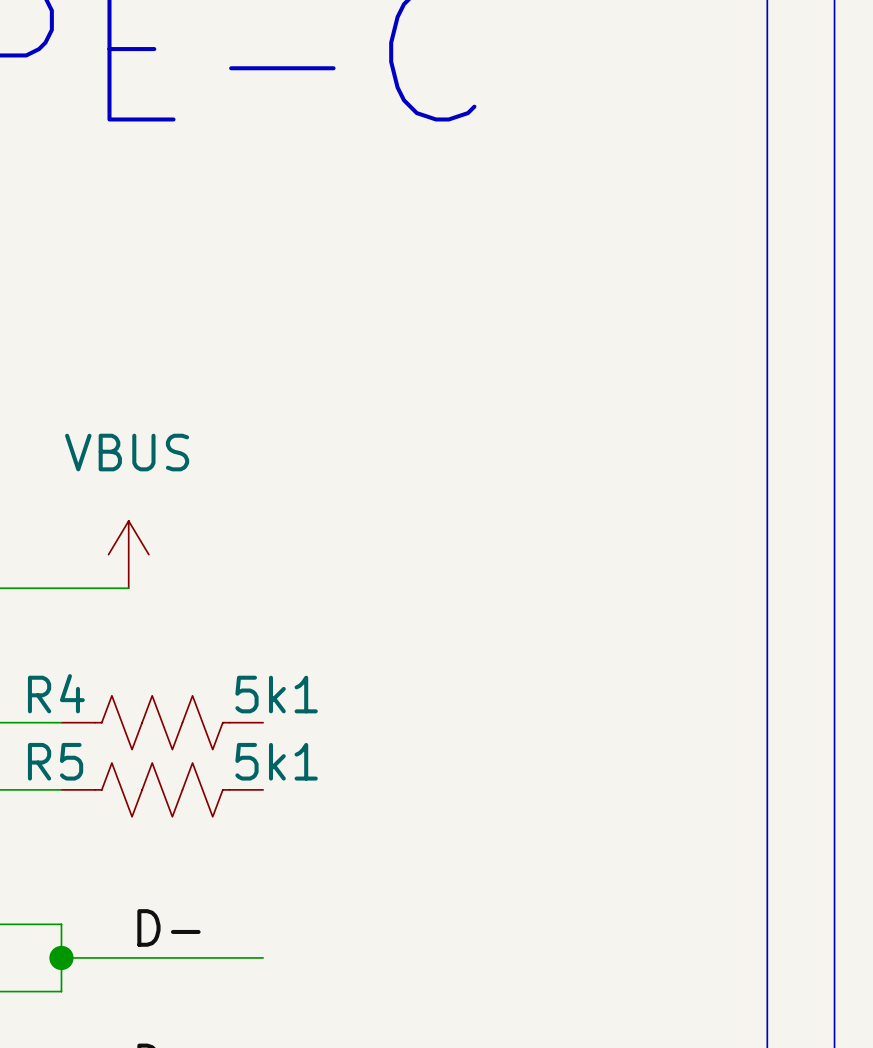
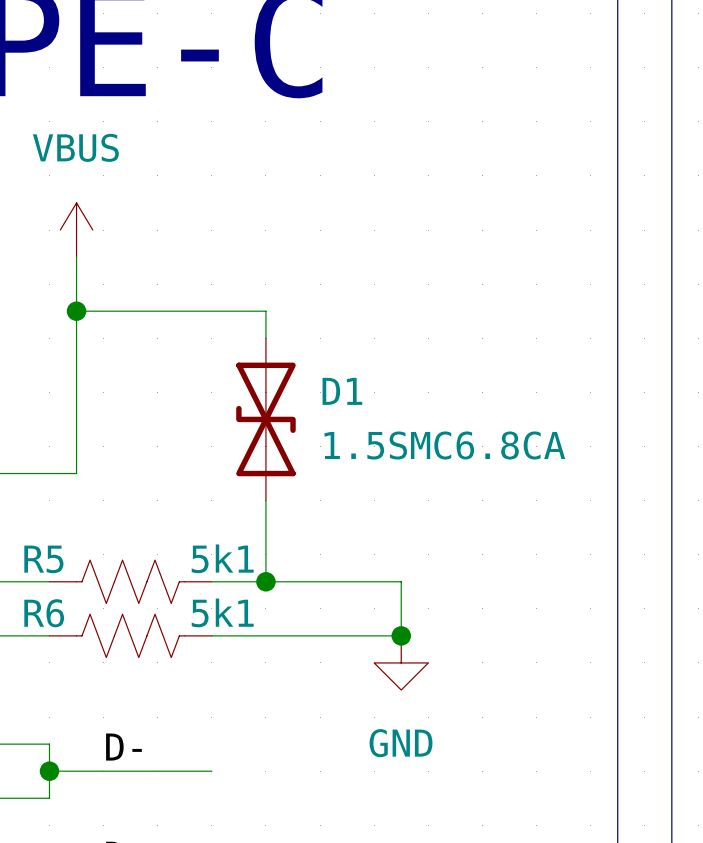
wire: none -> (76, 311) (265, 311) (265, 338)
junction: none -> (76, 311)
D1: none -> 1.5SMC6.8CA (265, 419)
power symbol position: VBUS (128, 554) -> VBUS (76, 230)
wire: (95, 588) (128, 588) -> (76, 473) (76, 257)
wire: none -> (265, 500) (265, 581)
R4 name: R4 (56, 693) -> R5 (43, 559)
wire: none -> (211, 581) (401, 581) (401, 635) (211, 635)
junction: none -> (265, 581)
R5 name: R5 (55, 761) -> R6 (44, 613)
junction: none -> (401, 635)
power symbol: none -> GND (401, 662)

